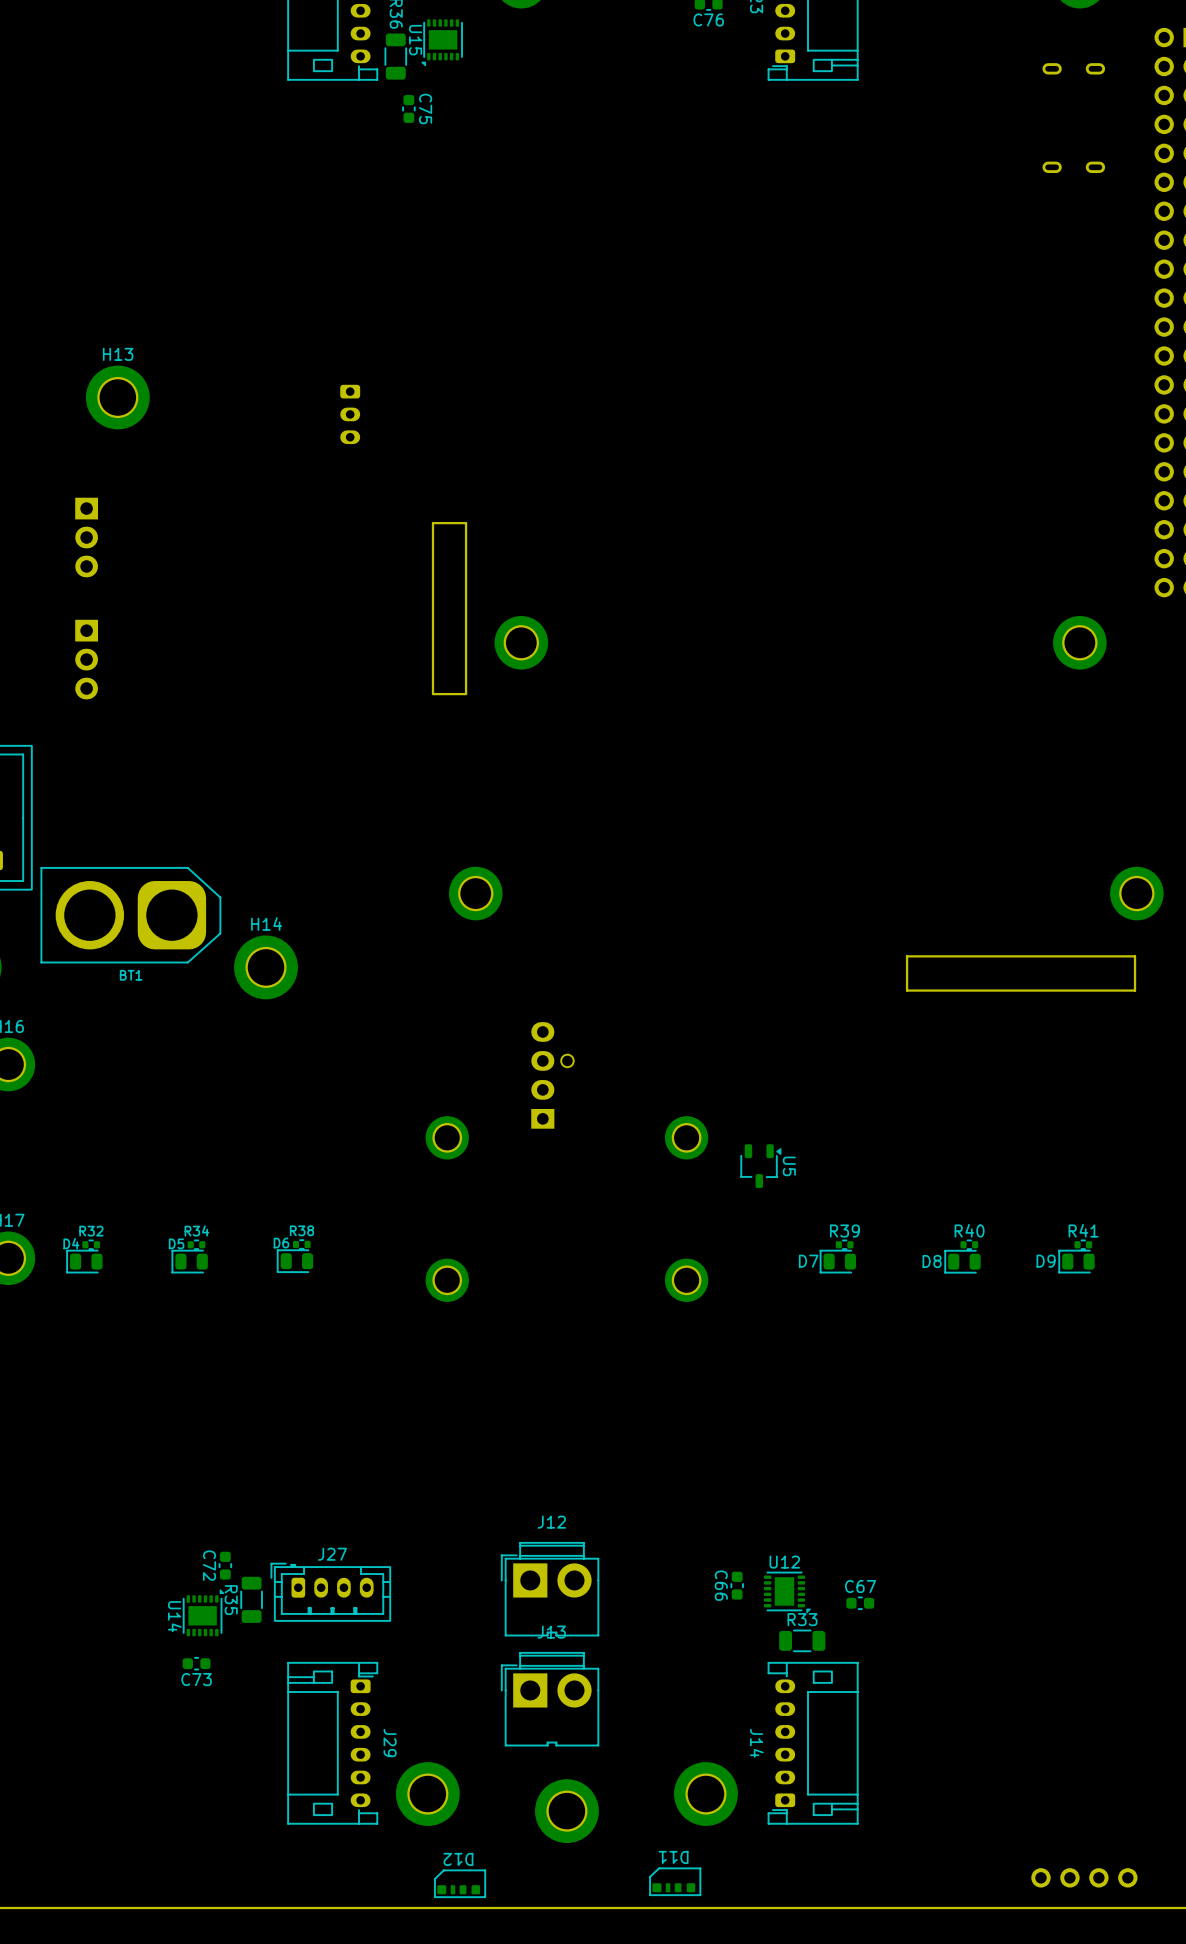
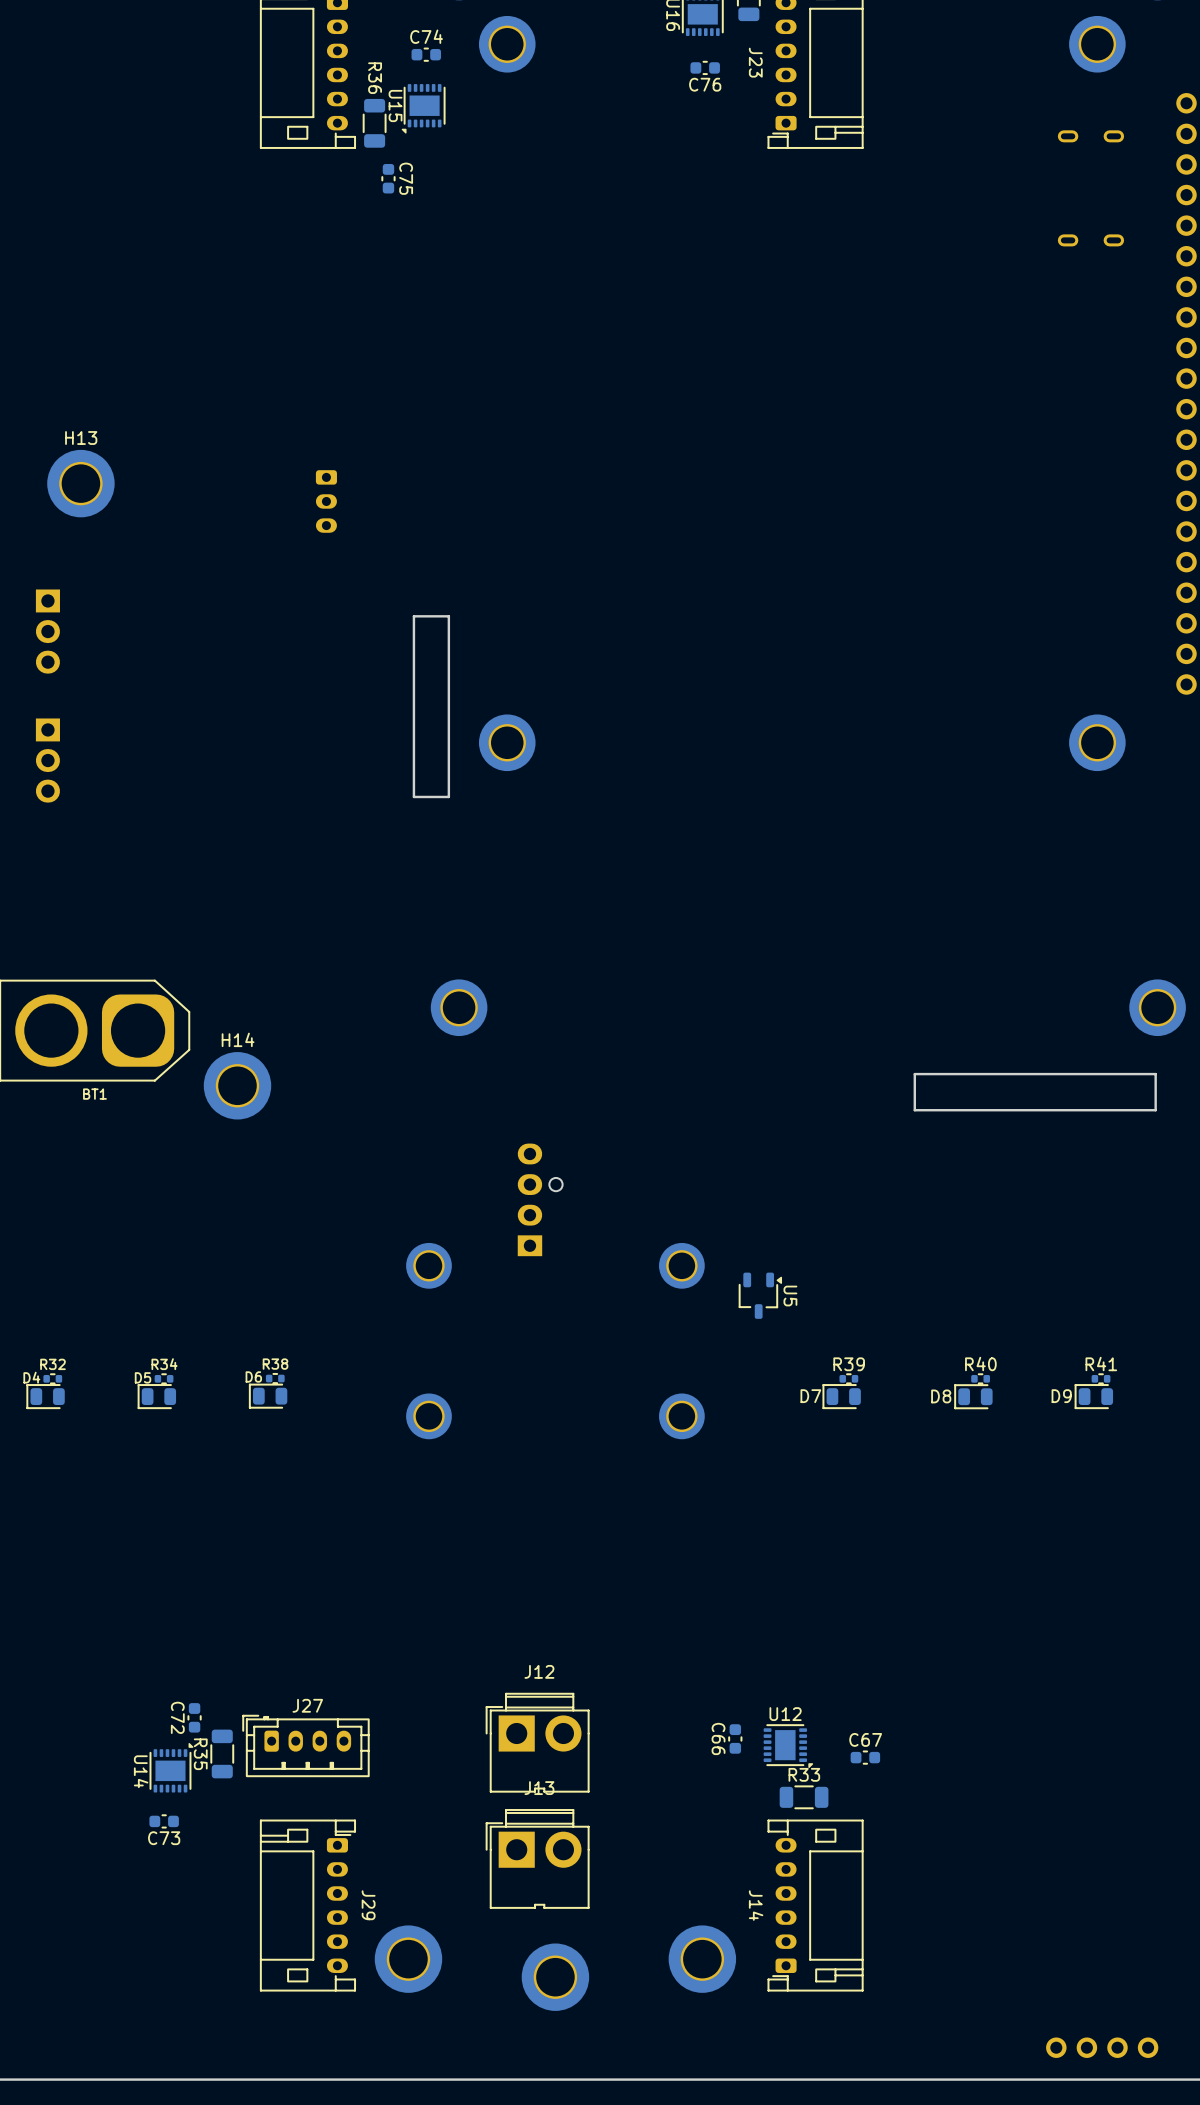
D11: (675, 1881) -> none
D12: (460, 1883) -> none

